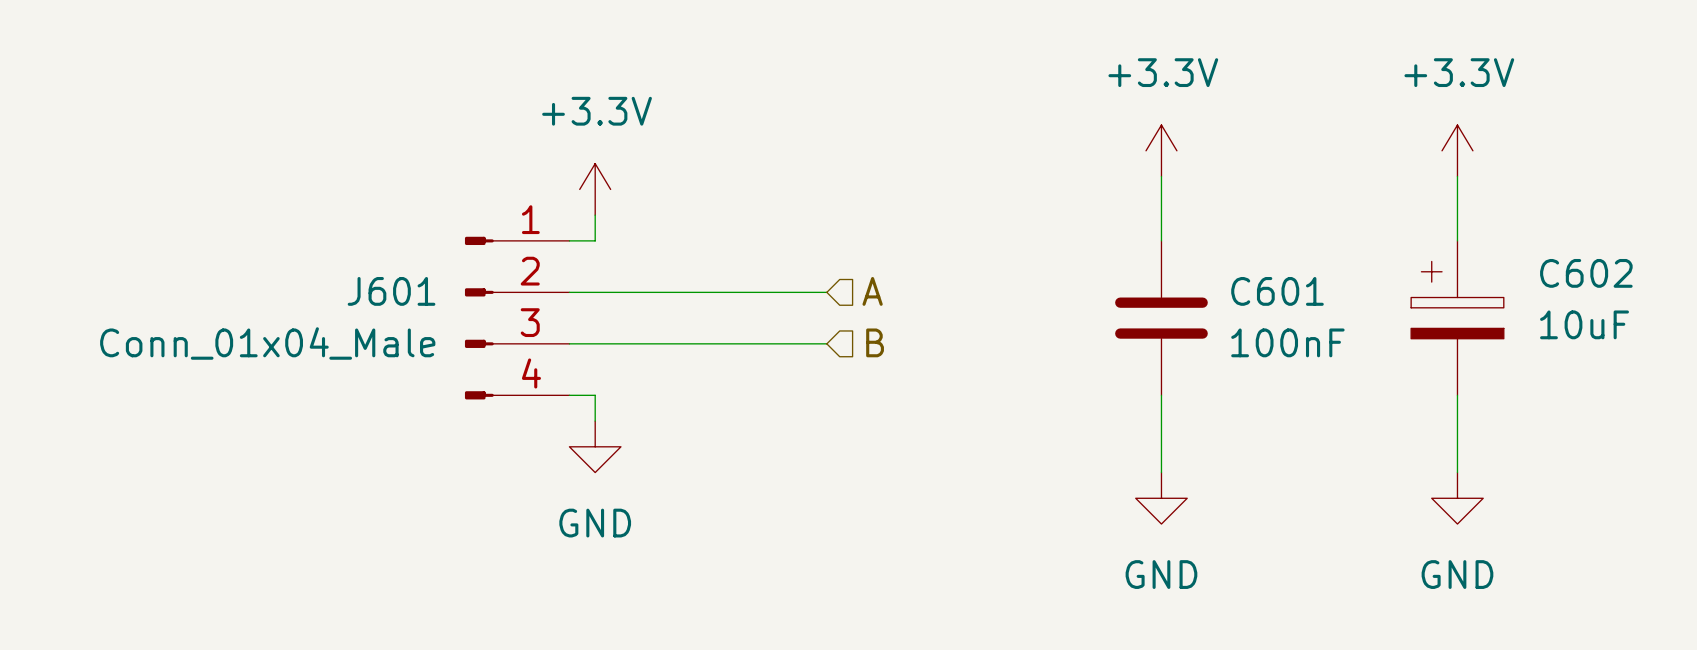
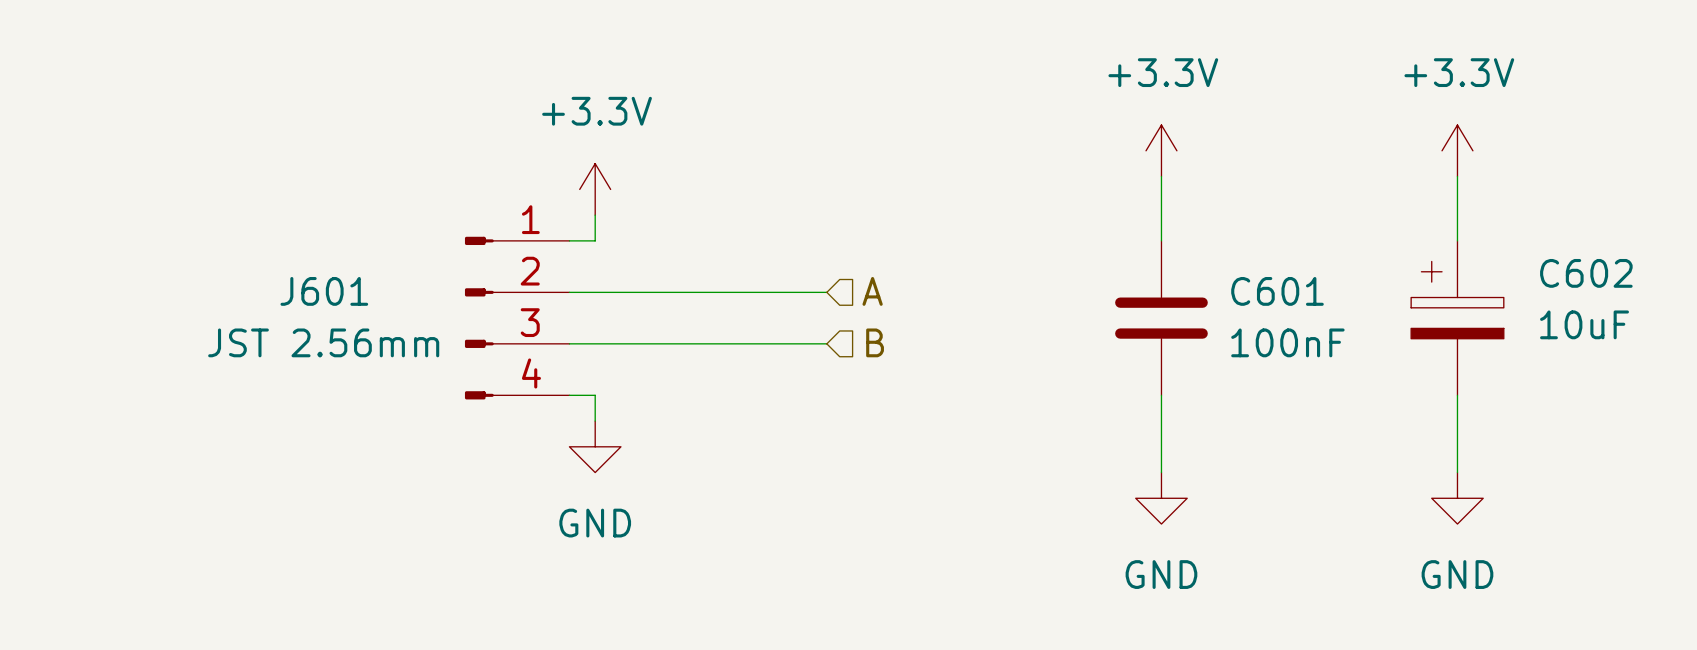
J601 name position: J601 (391, 291) -> J601 (324, 291)
J601 value: Conn_01x04_Male (267, 343) -> JST 2.56mm (323, 342)

